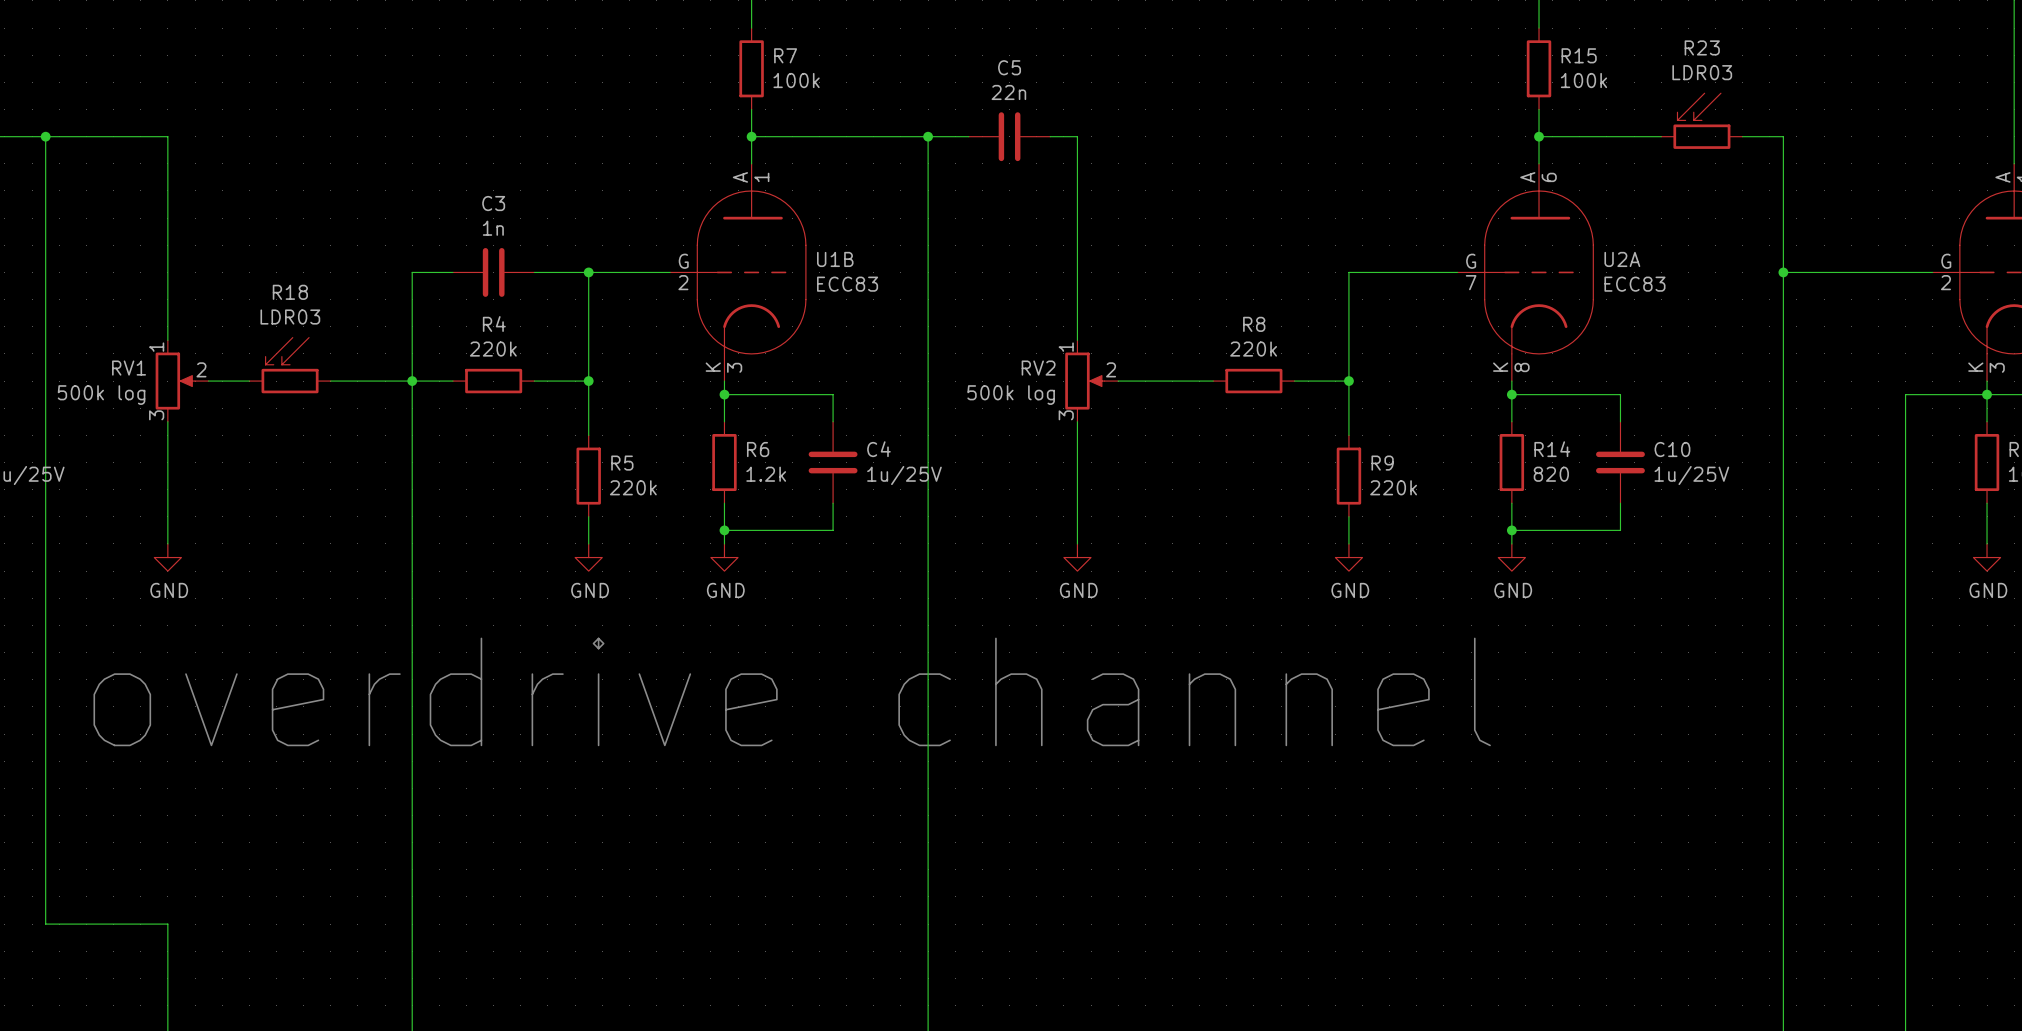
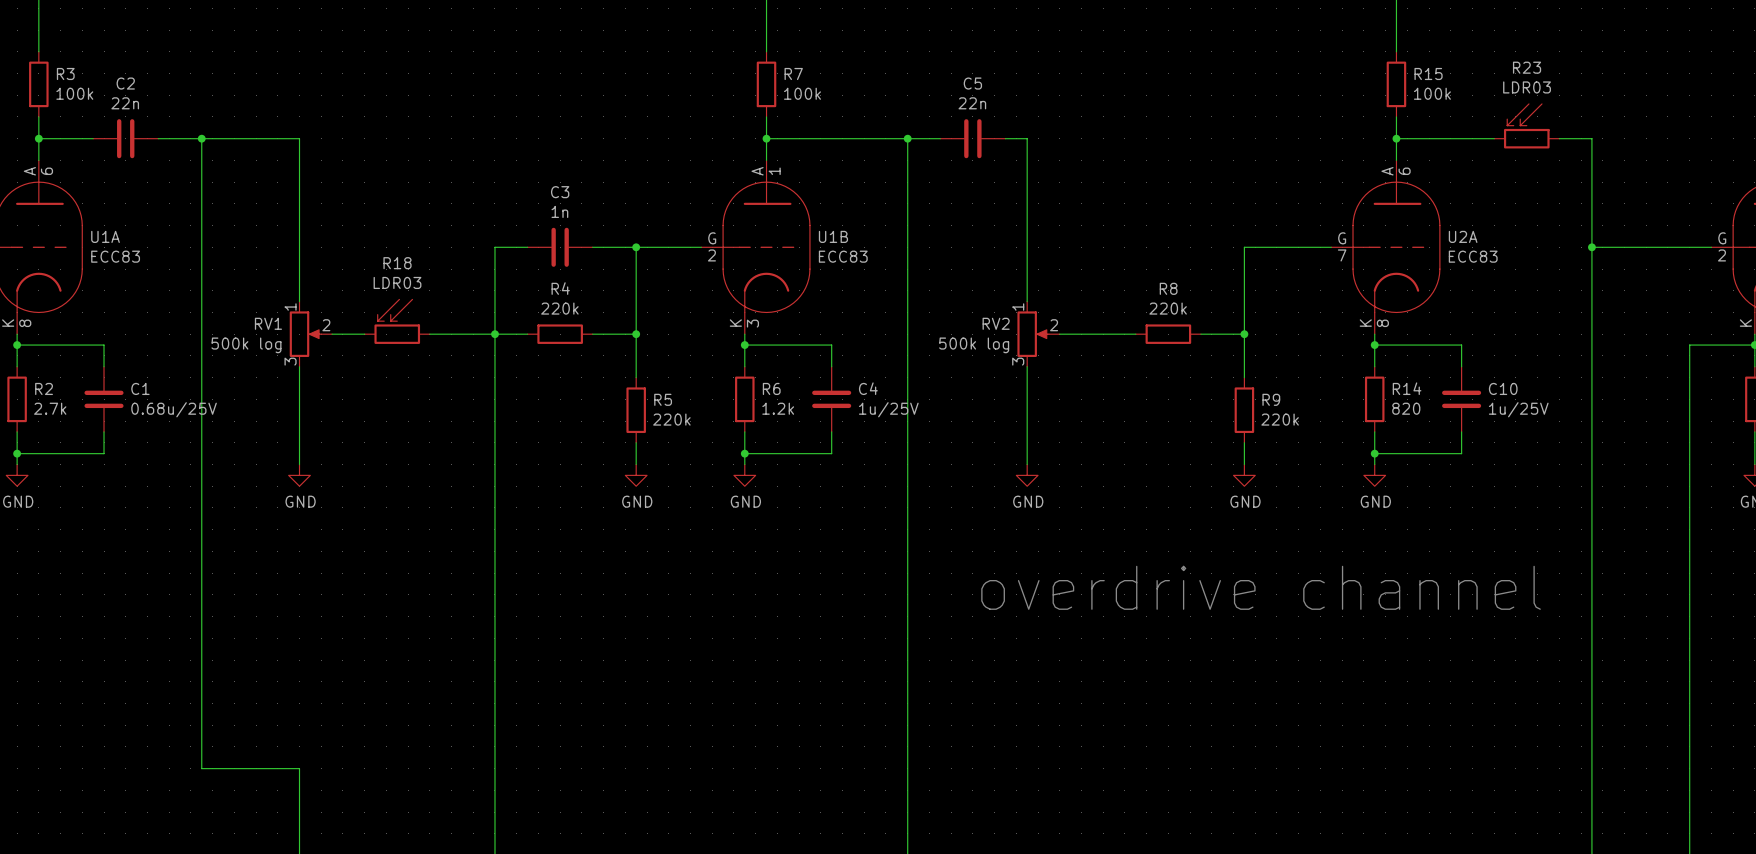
text: overdrive channel (792, 691) -> none
text: none -> overdrive channel (1261, 587)

